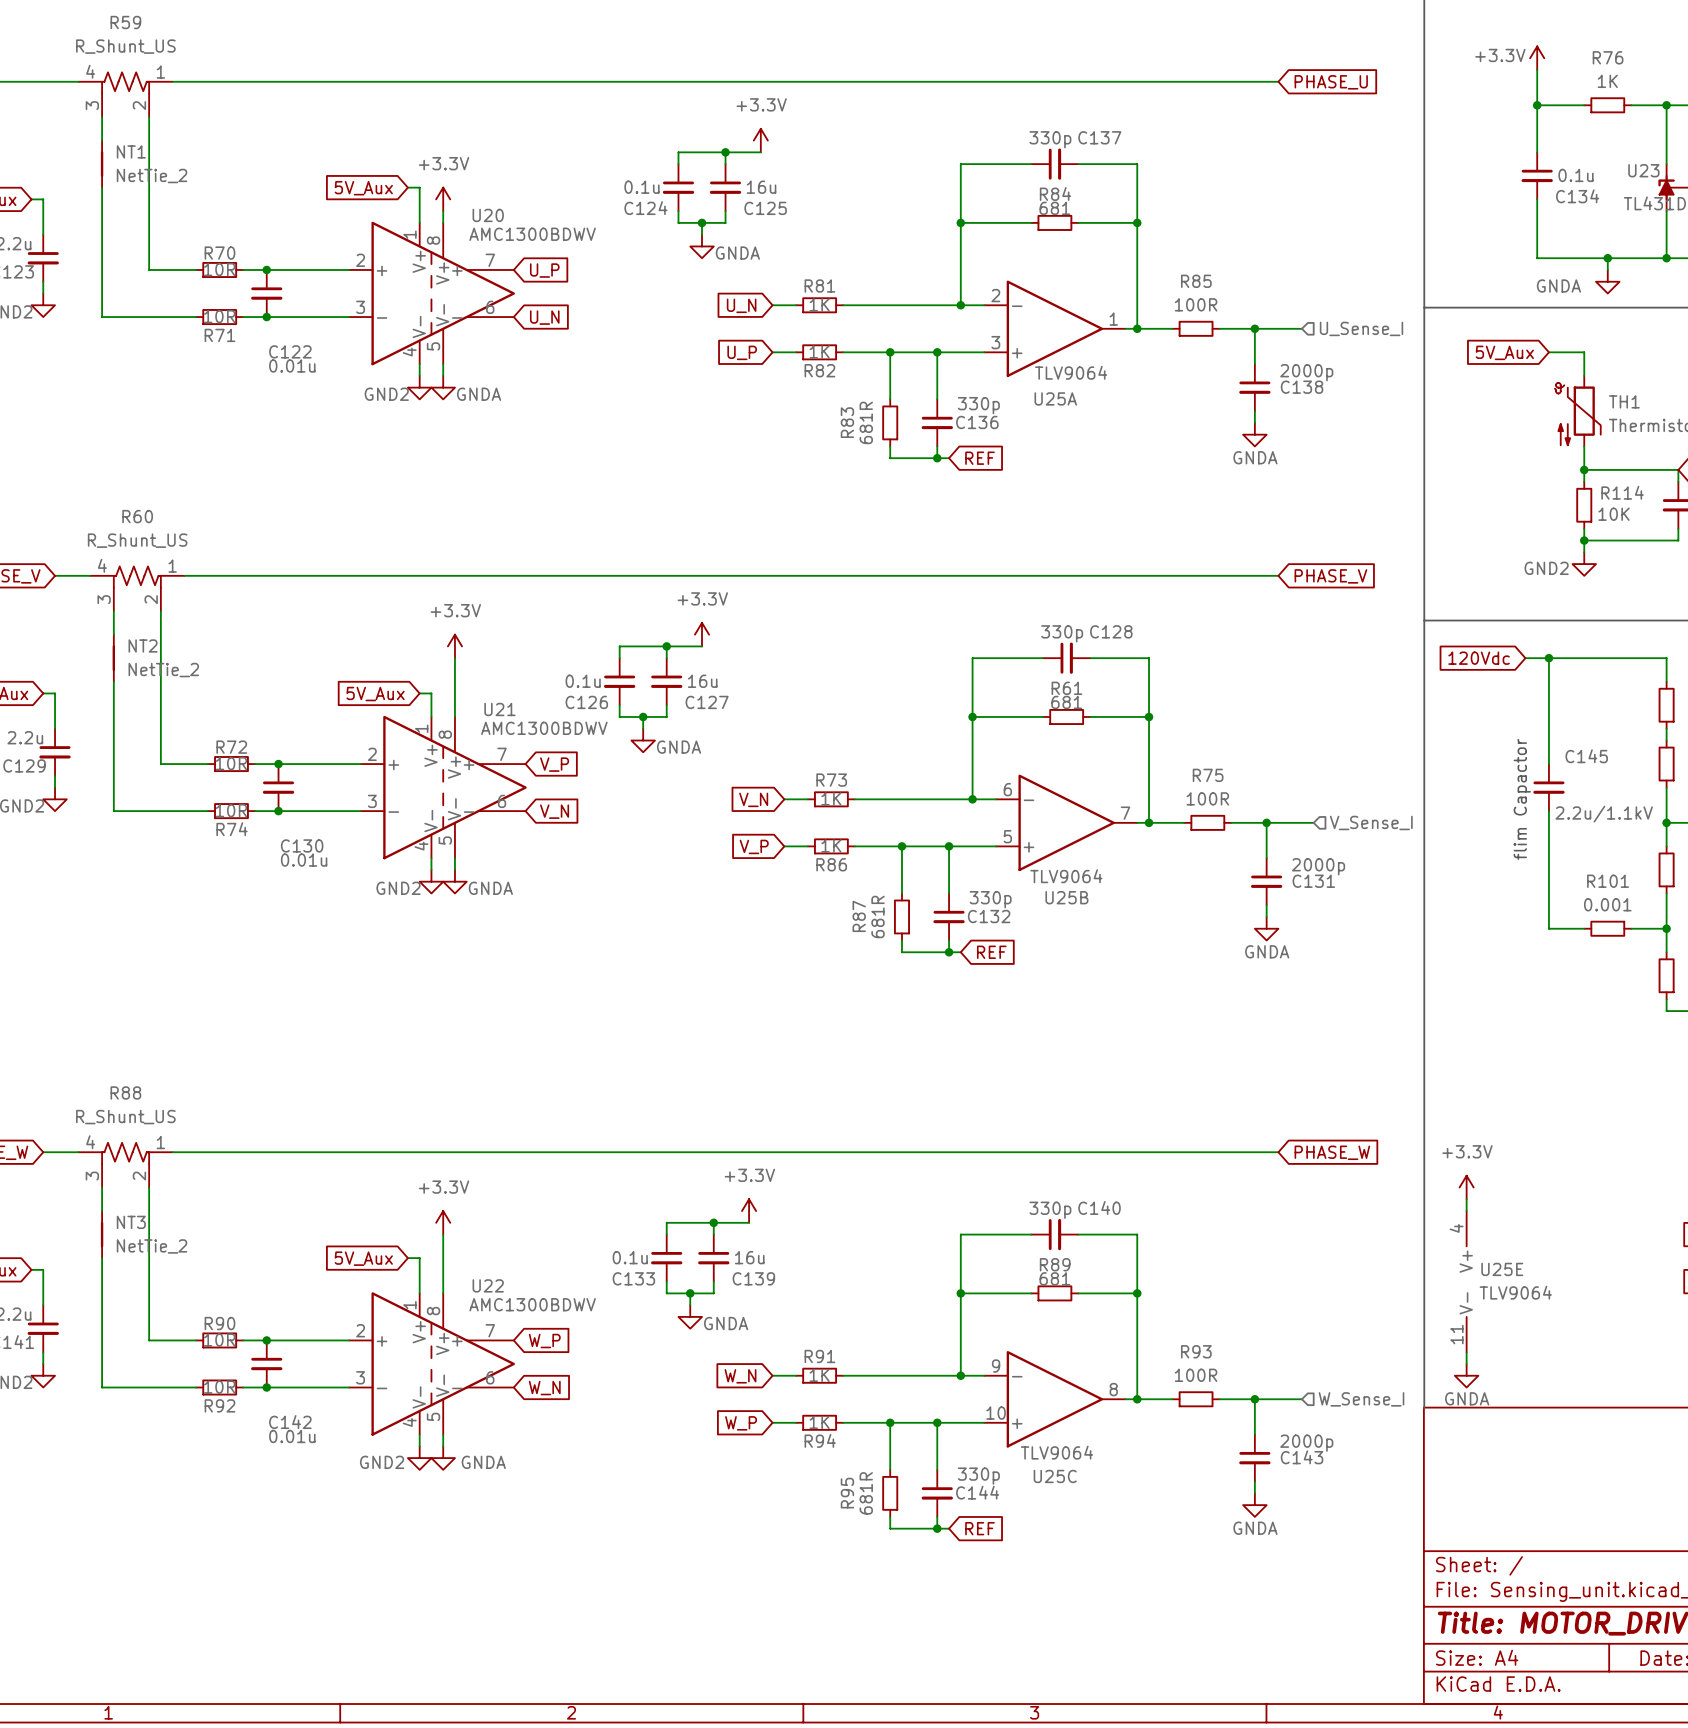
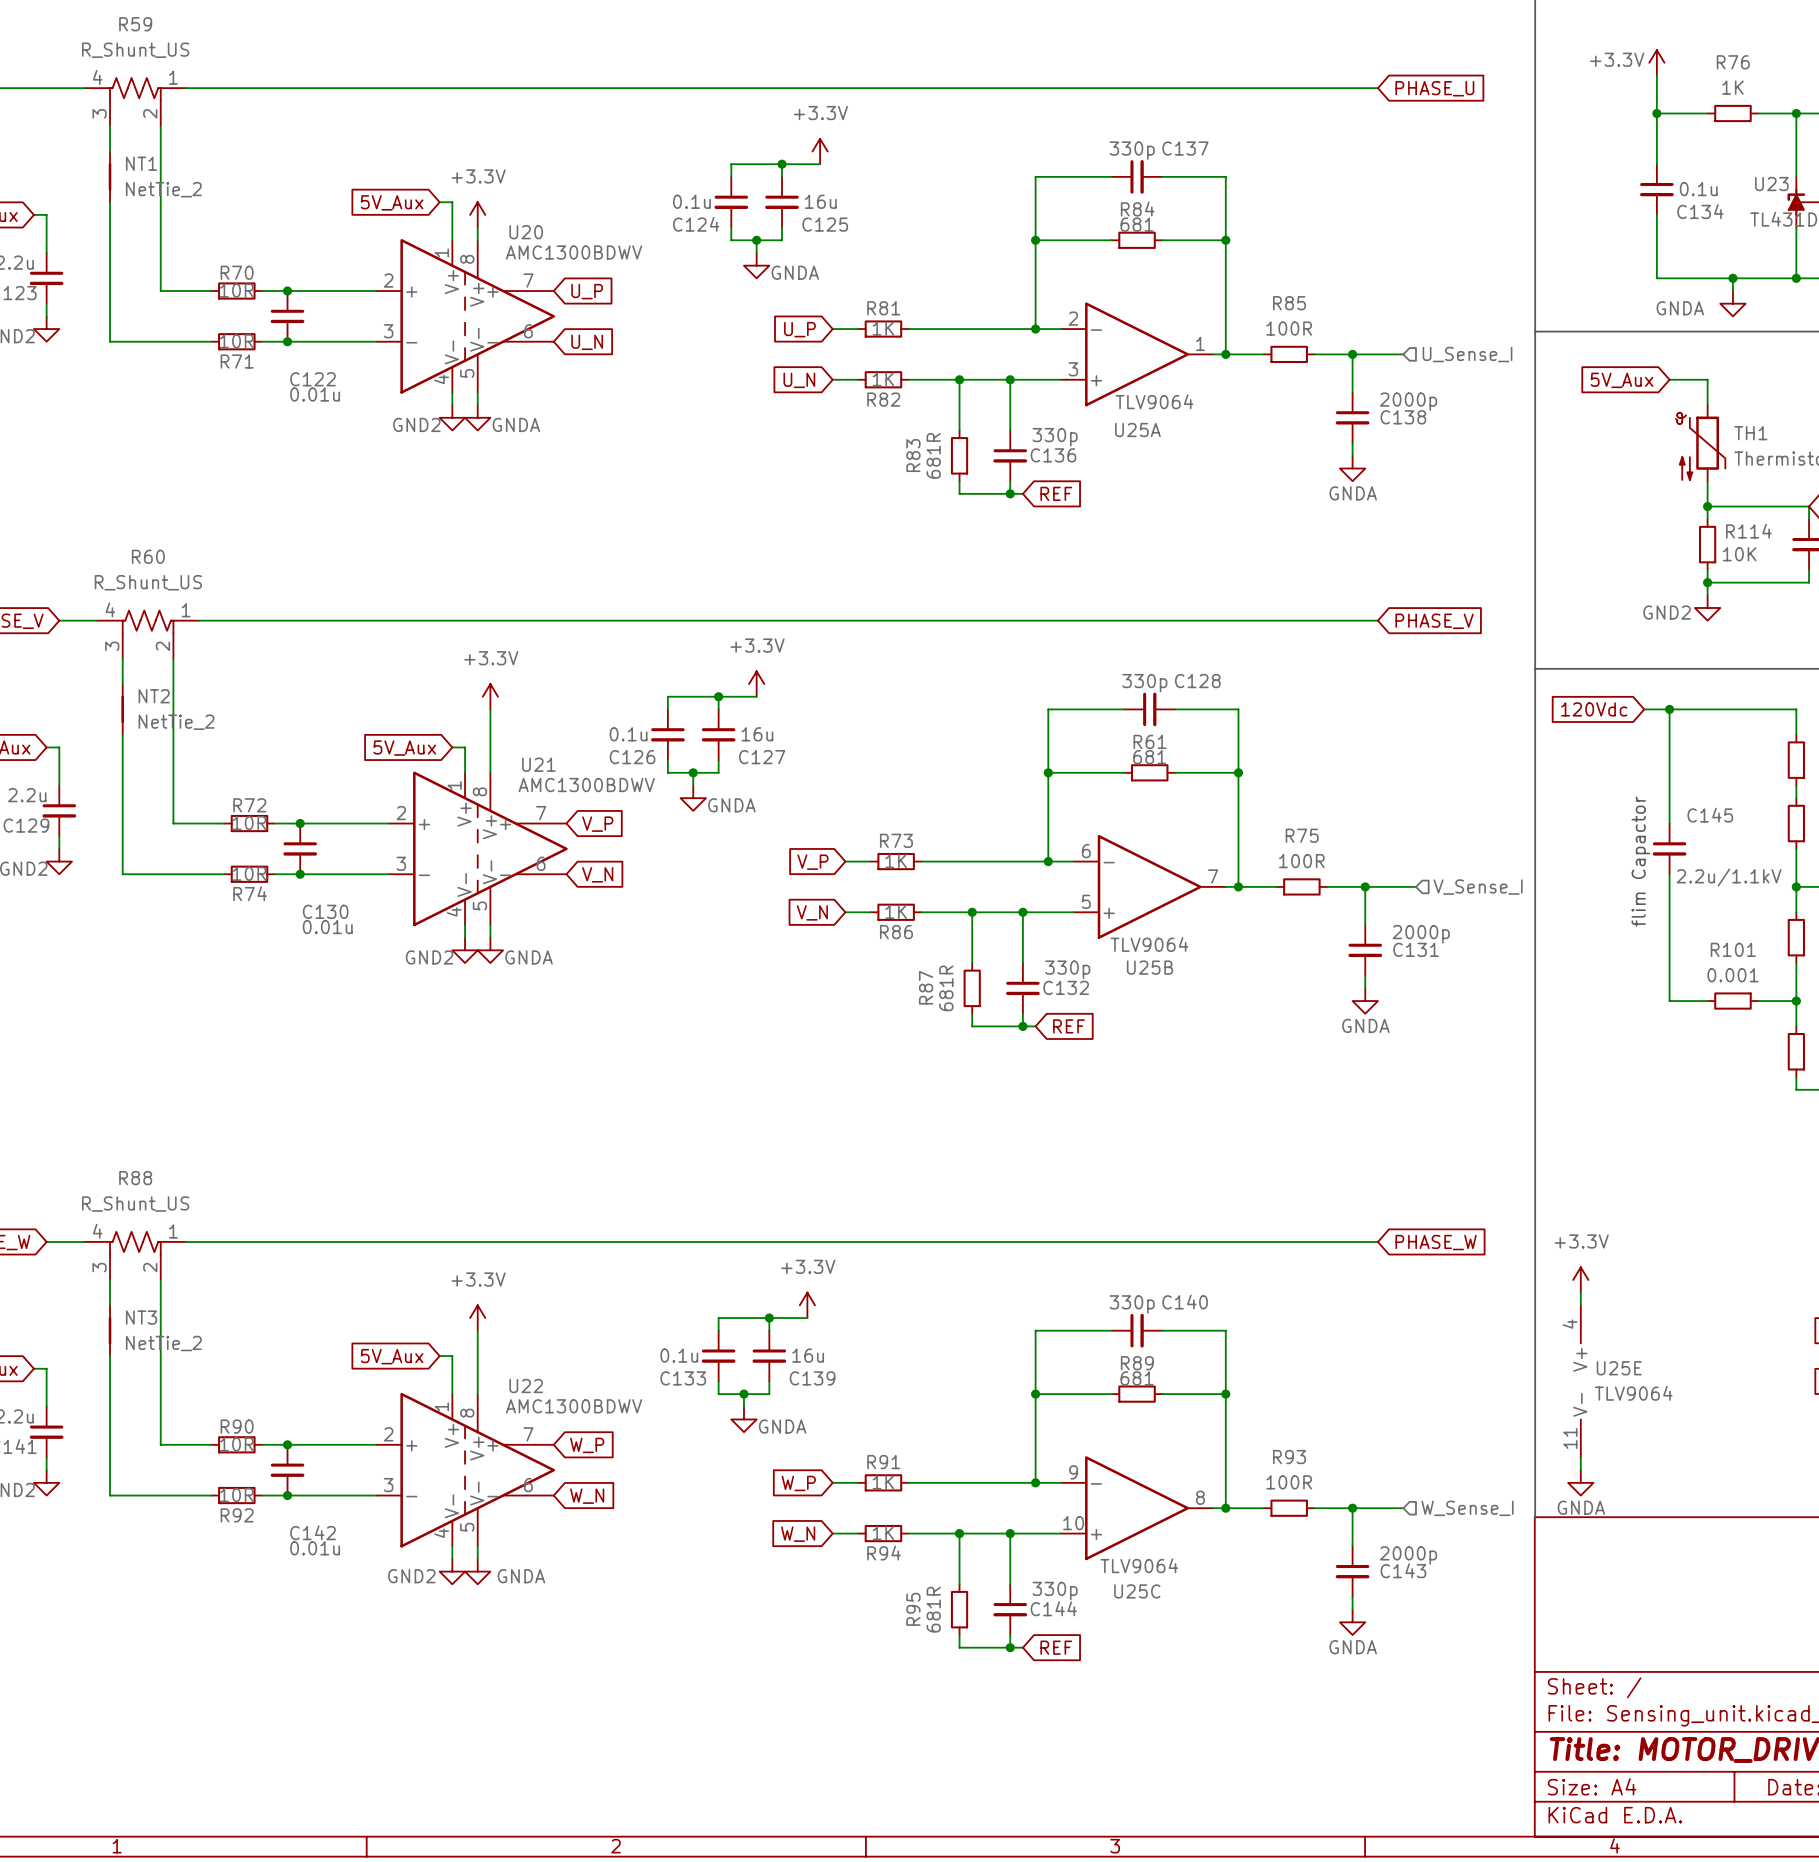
global label: U_N (741, 305) -> U_P (799, 329)
global label: U_P (742, 352) -> U_N (799, 380)
global label: V_N (753, 799) -> V_P (812, 862)
global label: V_P (754, 846) -> V_N (812, 912)
global label: W_N (740, 1376) -> W_P (798, 1483)
global label: W_P (741, 1423) -> W_N (798, 1534)

